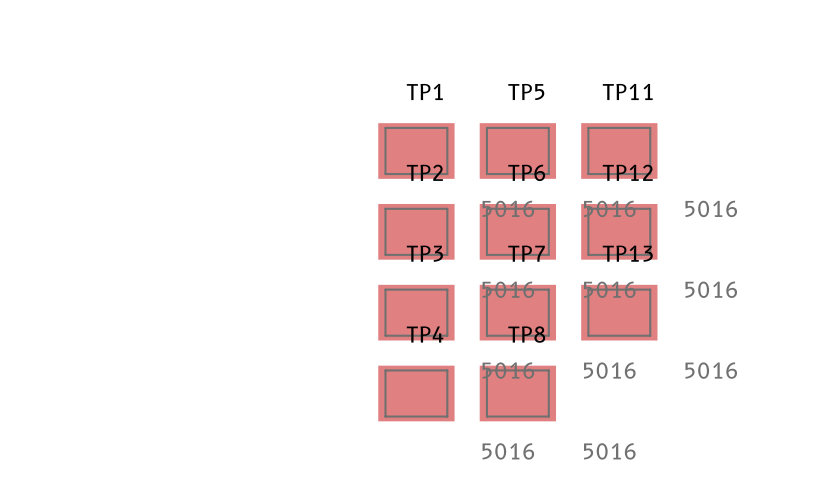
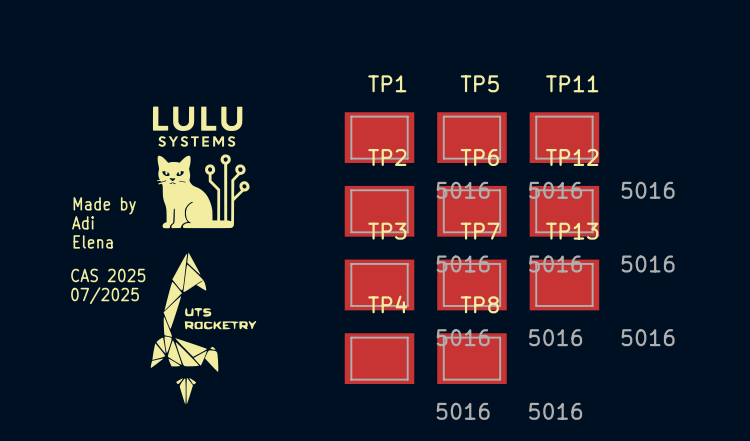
drawing: none -> [152, 106, 250, 229]
text: none -> Made by (104, 205)
text: none -> Adi (82, 222)
text: none -> Elena (93, 241)
drawing: none -> [150, 252, 257, 405]
text: none -> CAS 2025 (108, 275)
text: none -> 07/2025 (105, 295)

